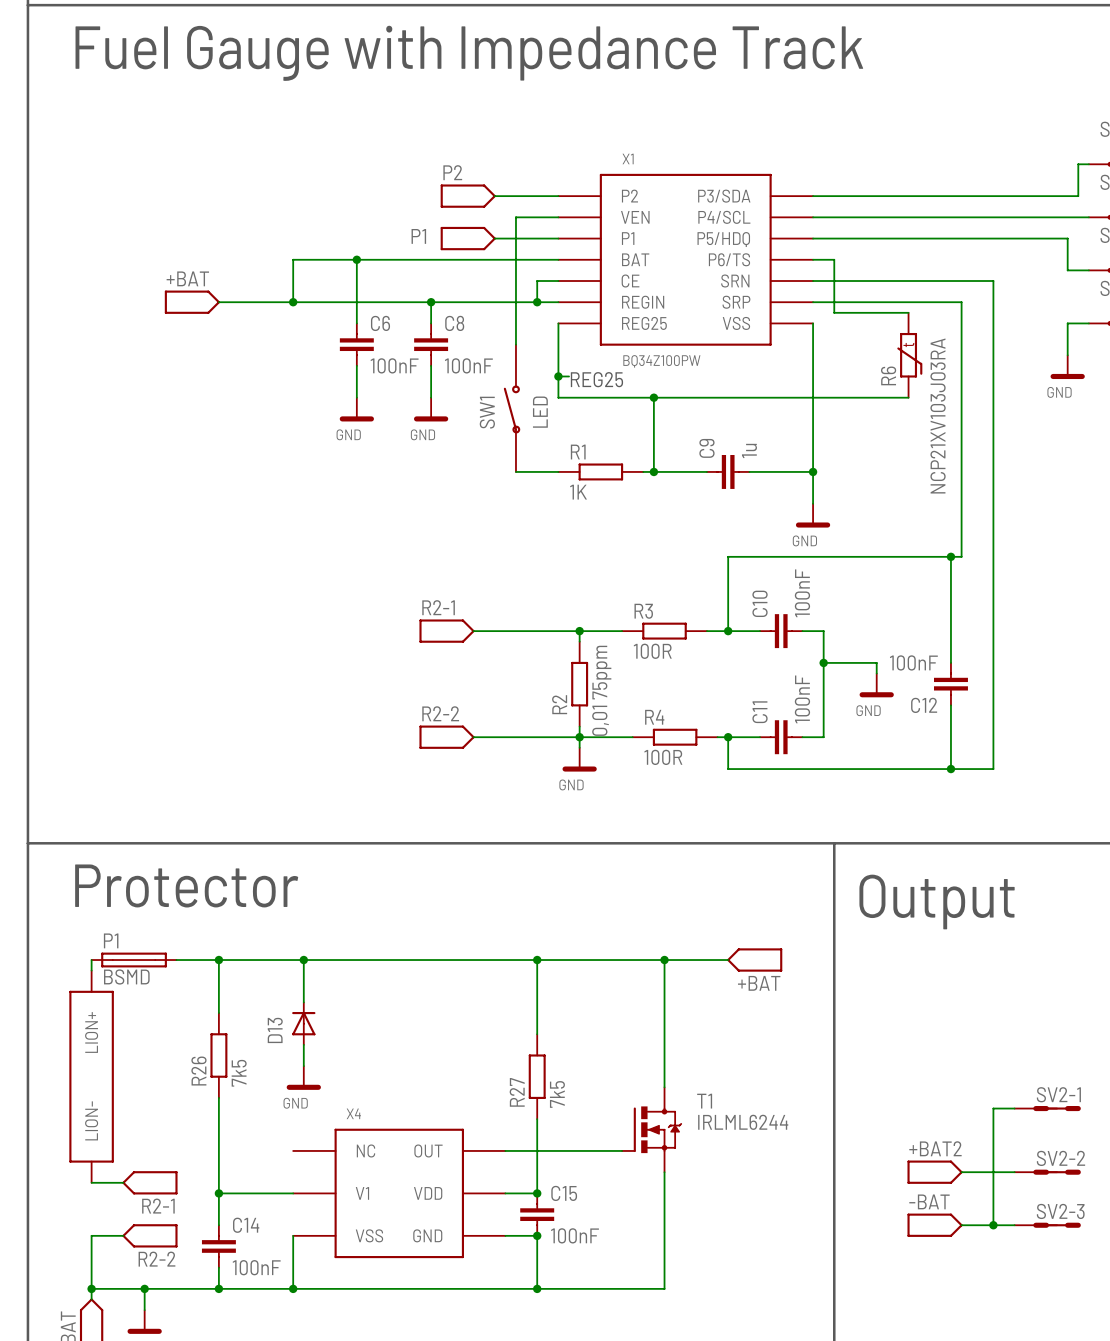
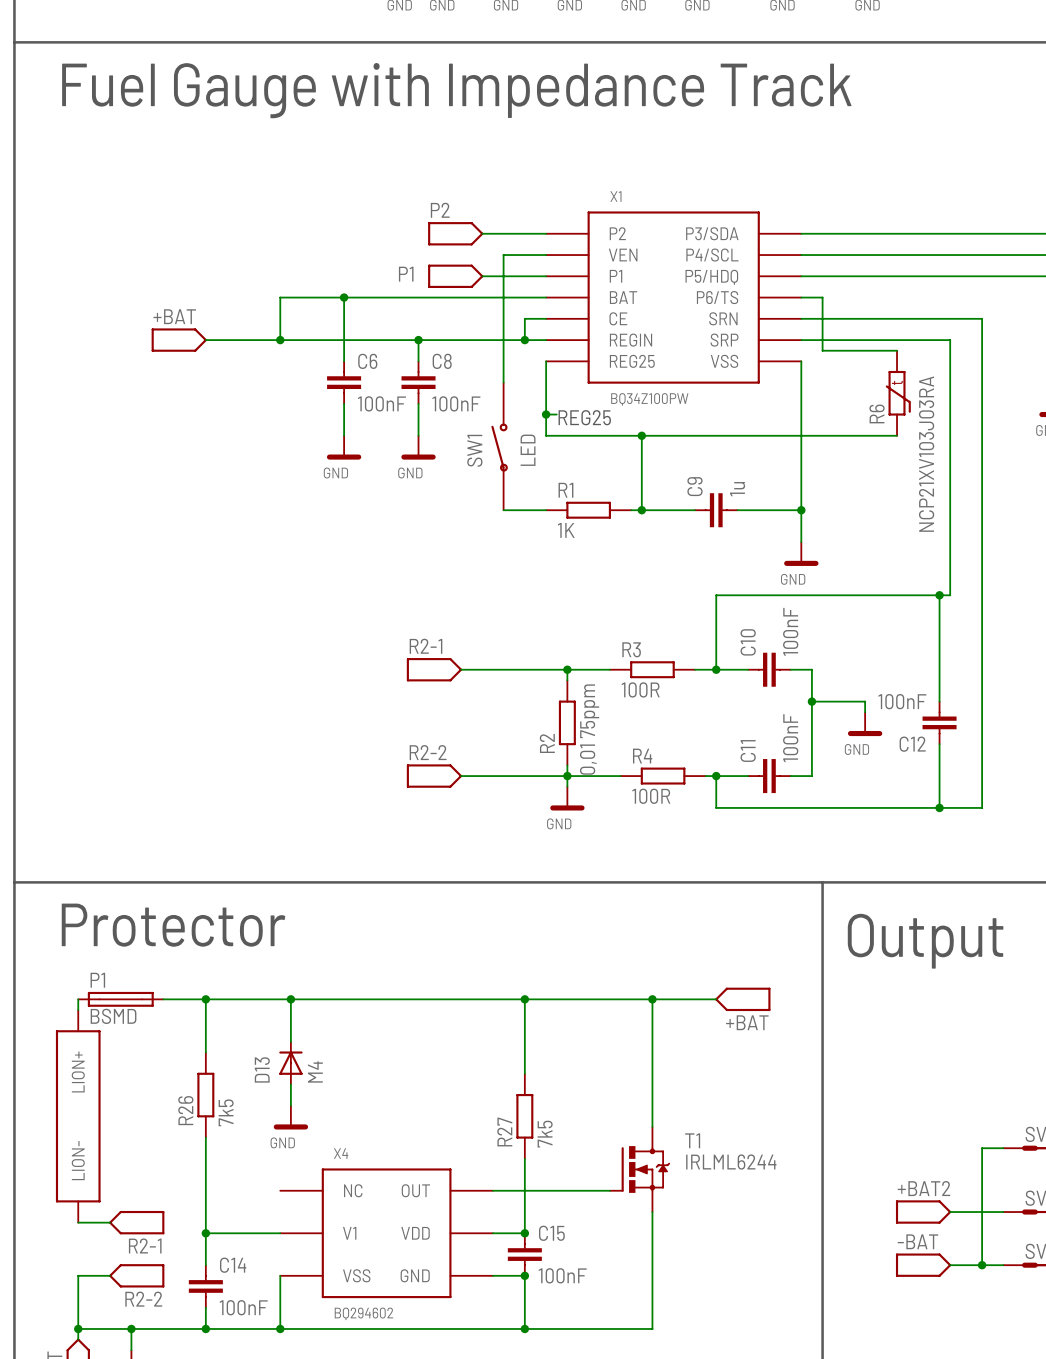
D13 value: none -> M4 (315, 1071)
X4 value: none -> BQ294602 (363, 1313)

